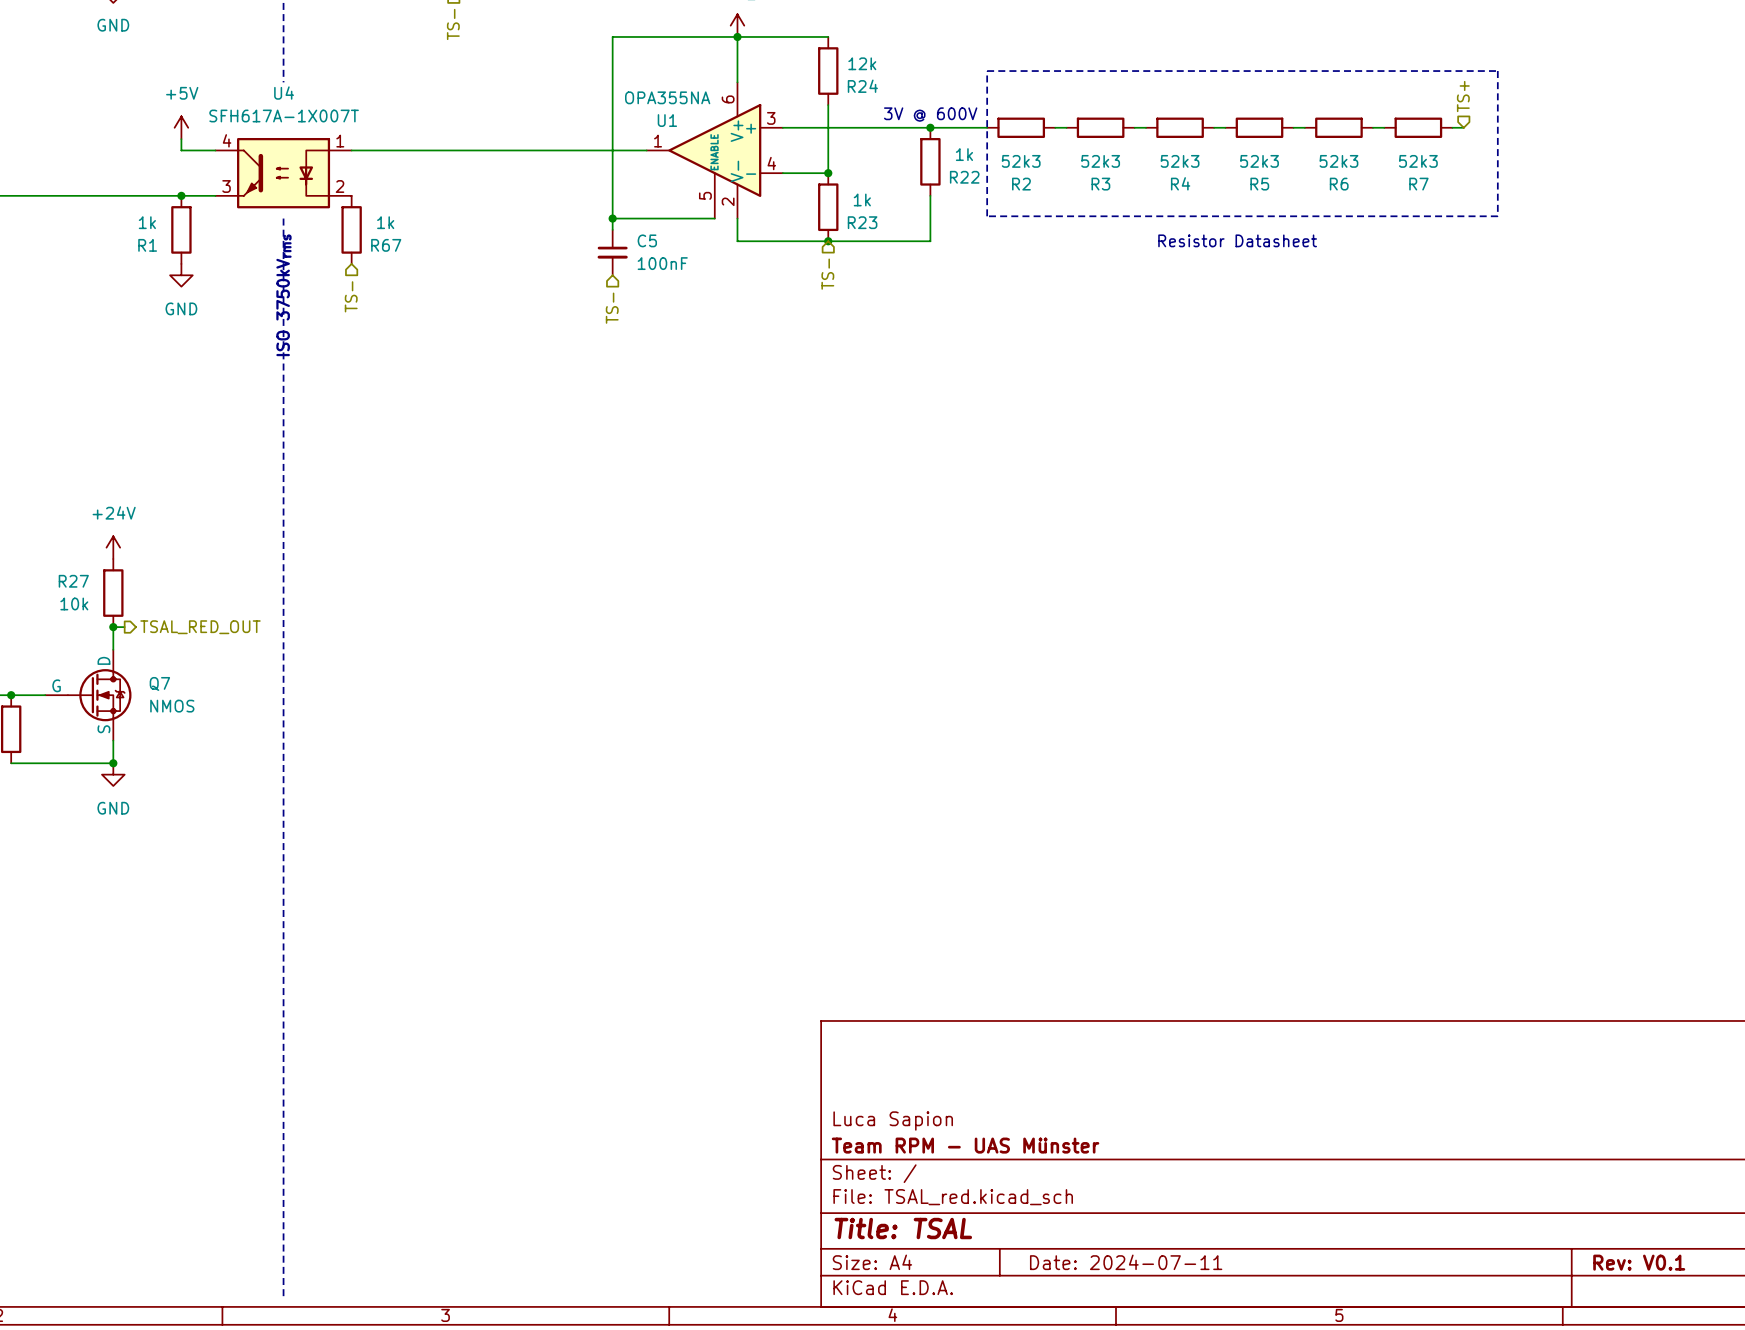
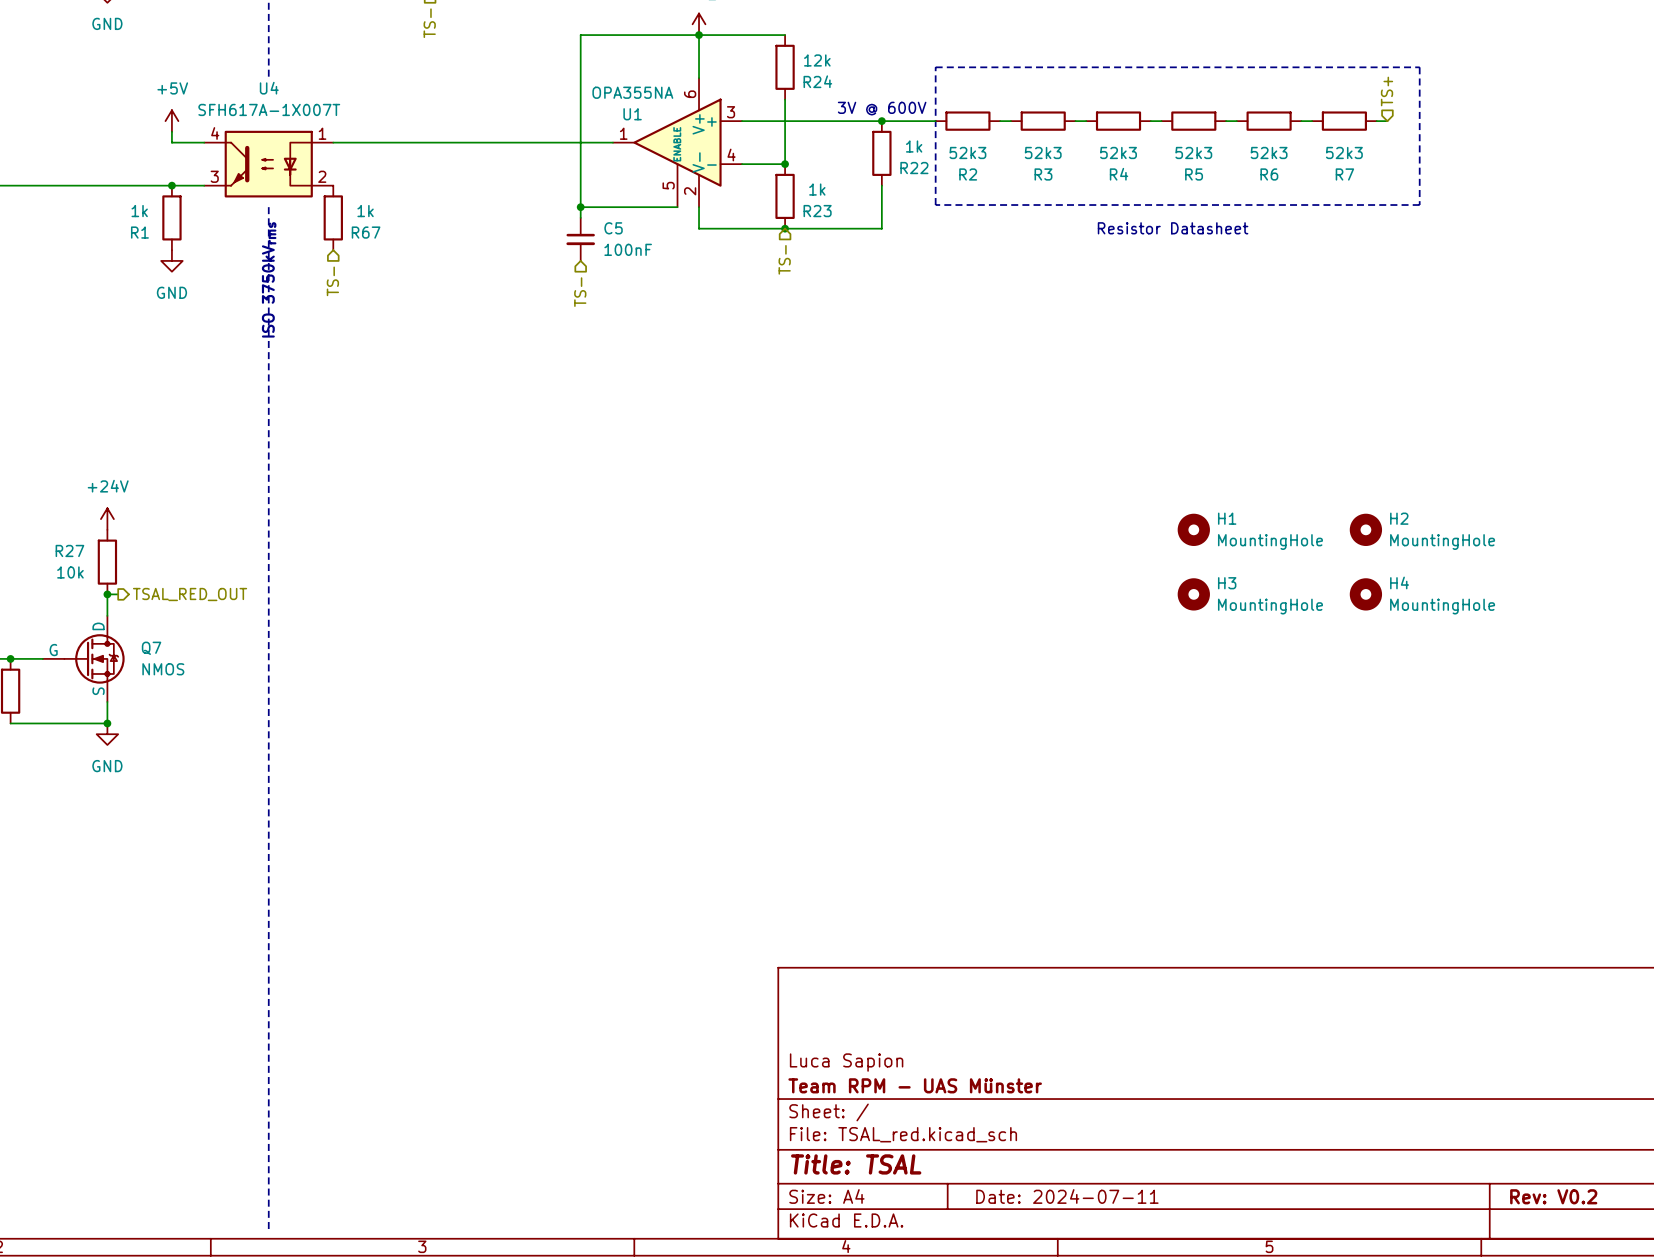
H1: none -> MountingHole (1193, 529)
H2: none -> MountingHole (1365, 529)
H3: none -> MountingHole (1193, 594)
H4: none -> MountingHole (1365, 594)
title block: Rev: V0.1 (1639, 1262) -> Rev: V0.2 (1553, 1196)

